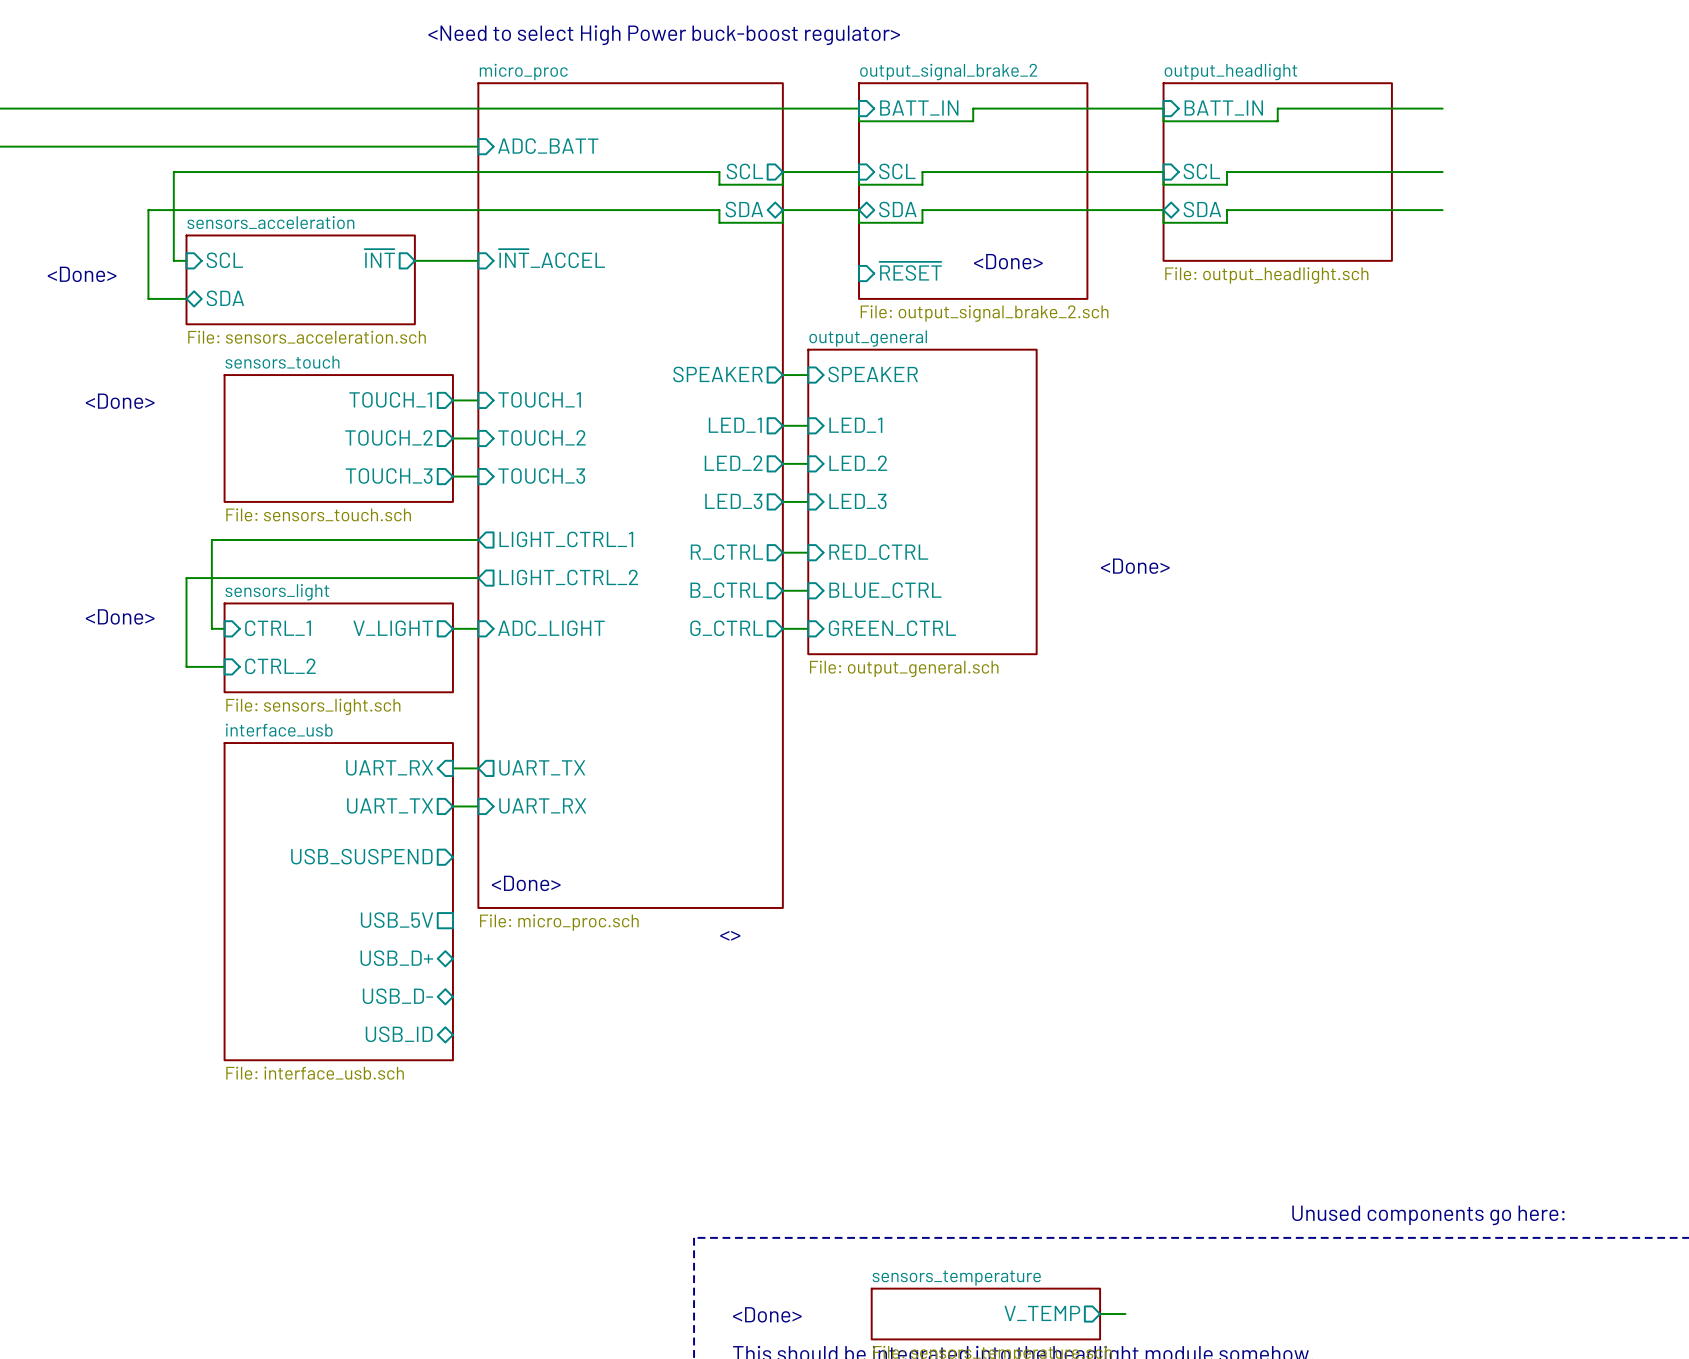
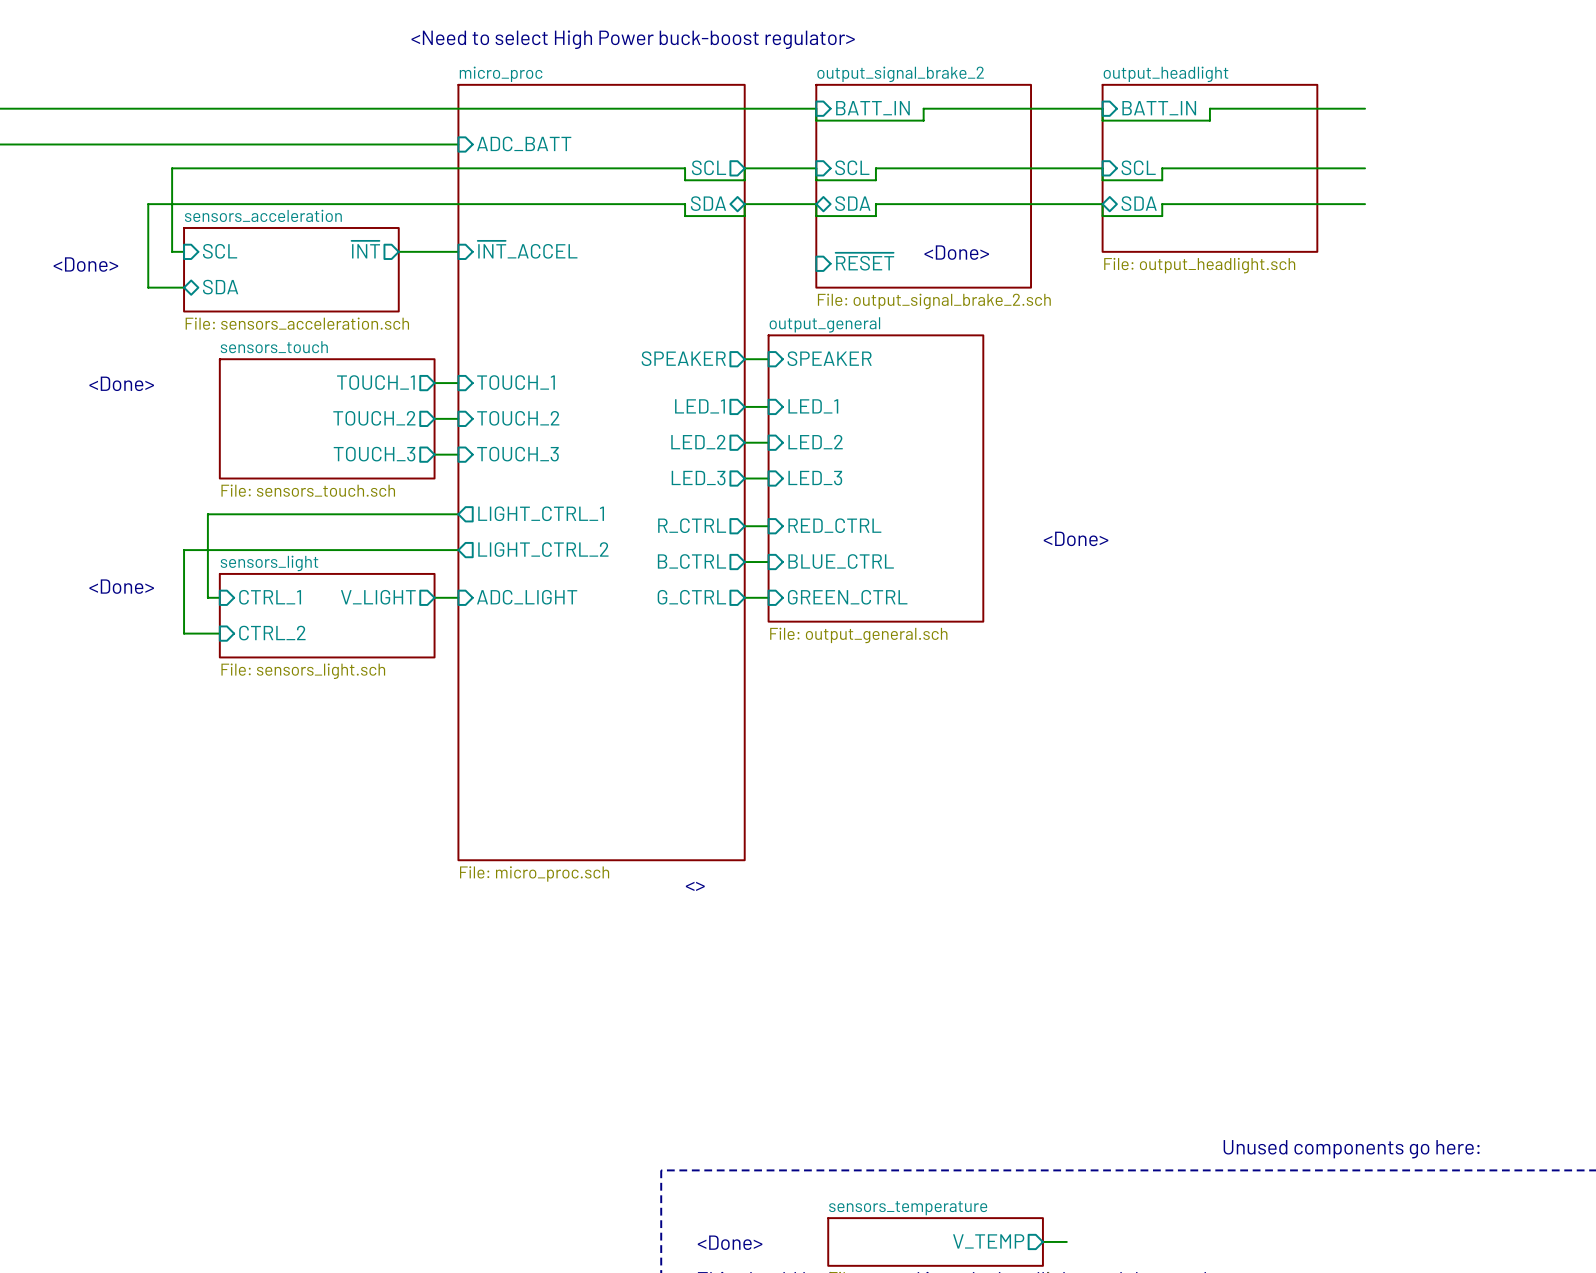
sheet pin: UART_RX (389, 767) -> none
sheet pin: UART_TX (542, 767) -> none
wire: (452, 768) (478, 768) -> none
sheet pin: UART_TX (390, 805) -> none
sheet pin: UART_RX (542, 805) -> none
wire: (452, 806) (478, 806) -> none
sheet pin: USB_SUSPEND (361, 856) -> none
text: <Done> (526, 883) -> none
sheet interface_usb: File: interface_usb.sch (338, 901) -> none
sheet pin: USB_5V (397, 920) -> none
sheet pin: USB_D+ (396, 958) -> none
sheet pin: USB_D- (397, 996) -> none
sheet pin: USB_ID (399, 1034) -> none

